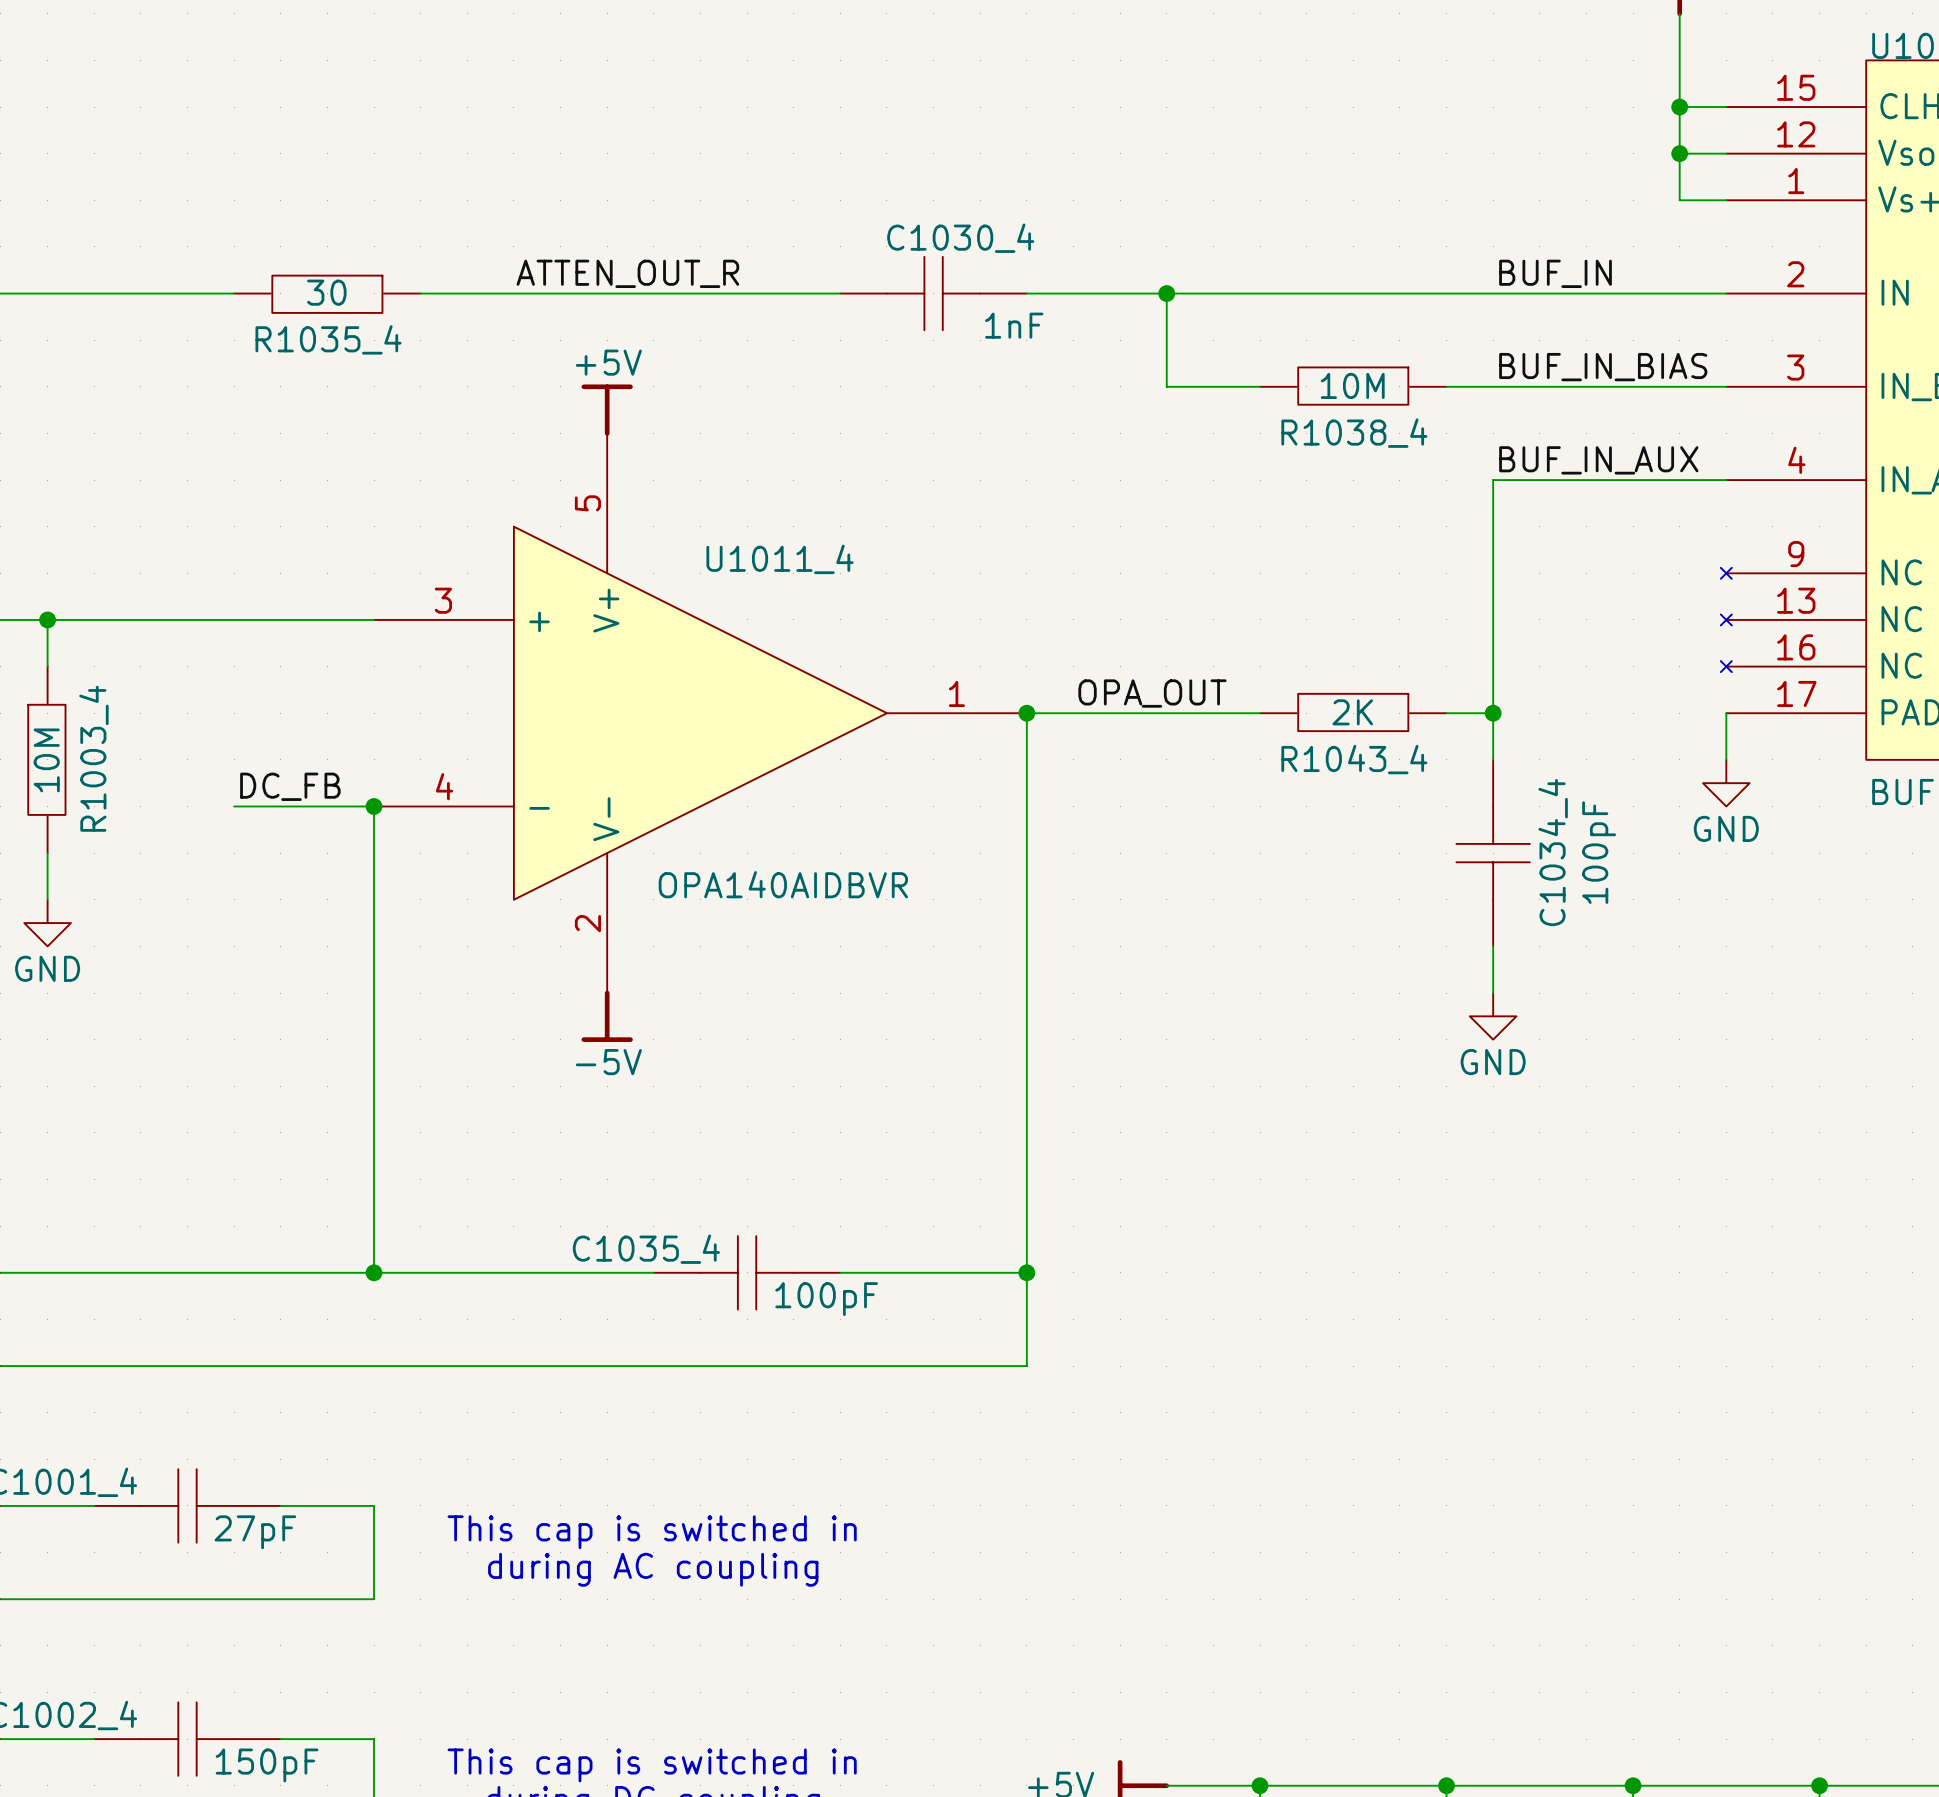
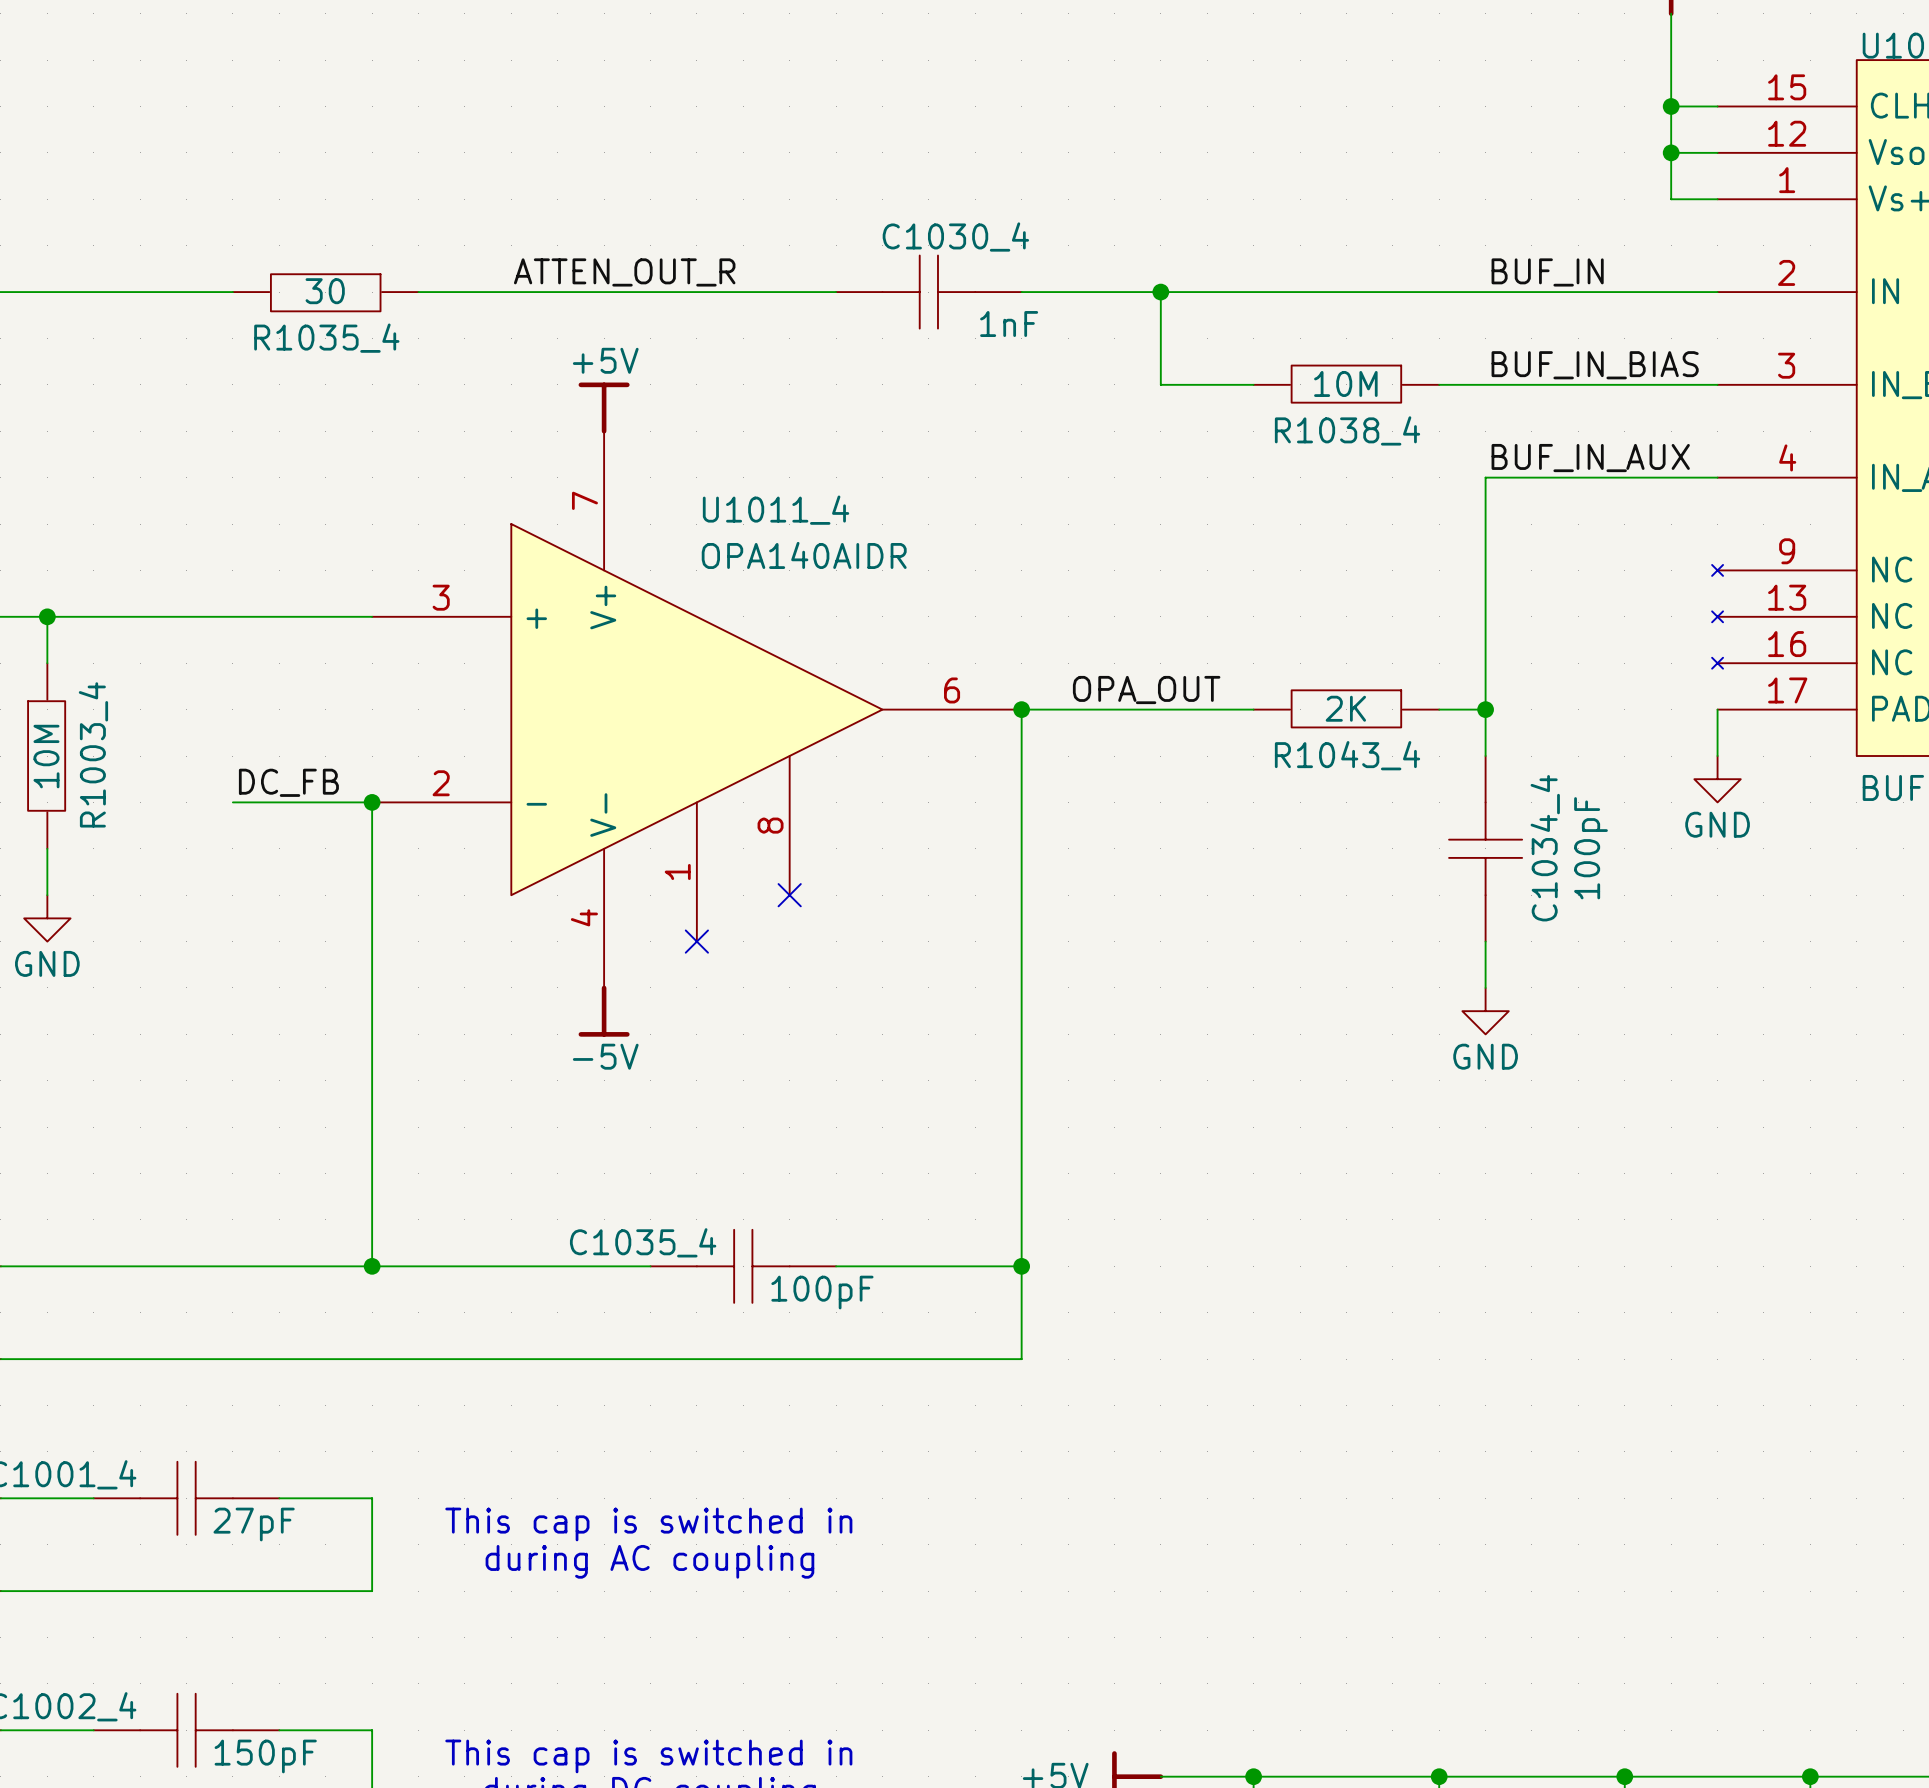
U1011_4 symbol: [374, 433, 1027, 994] -> [372, 431, 1022, 988]
U1011_4 name position: U1011_4 (779, 559) -> U1011_4 (776, 510)
U1011_4 value: OPA140AIDBVR (783, 884) -> OPA140AIDR (804, 555)
no-connect mark: none -> (789, 895)
no-connect mark: none -> (696, 941)

